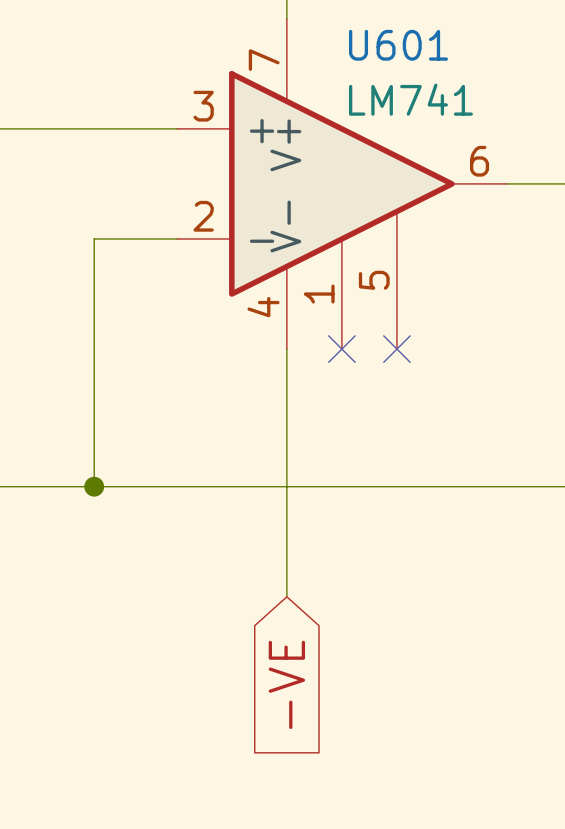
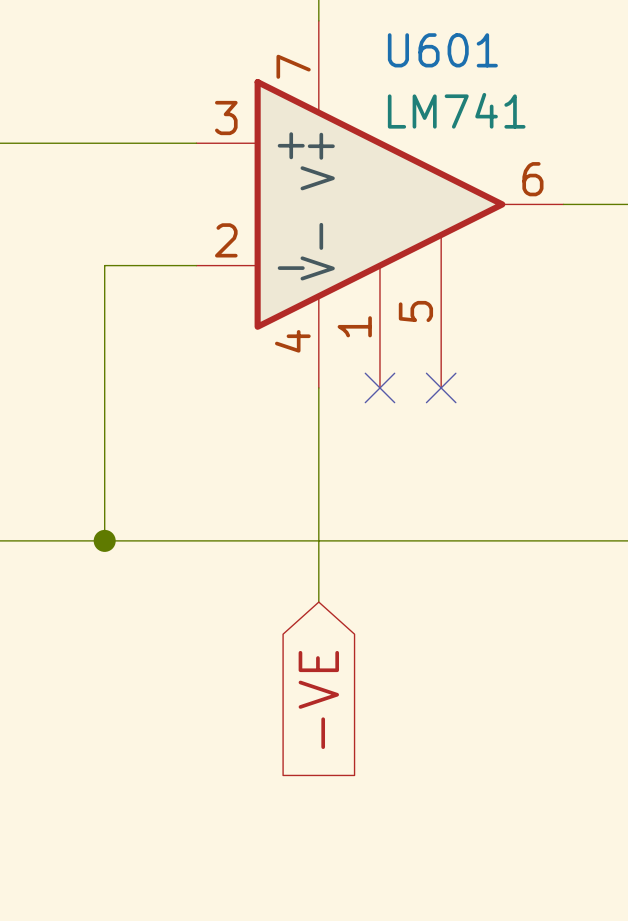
wire: (286, 541) (286, 596) -> none
global label position: -VE (286, 684) -> -VE (318, 699)

